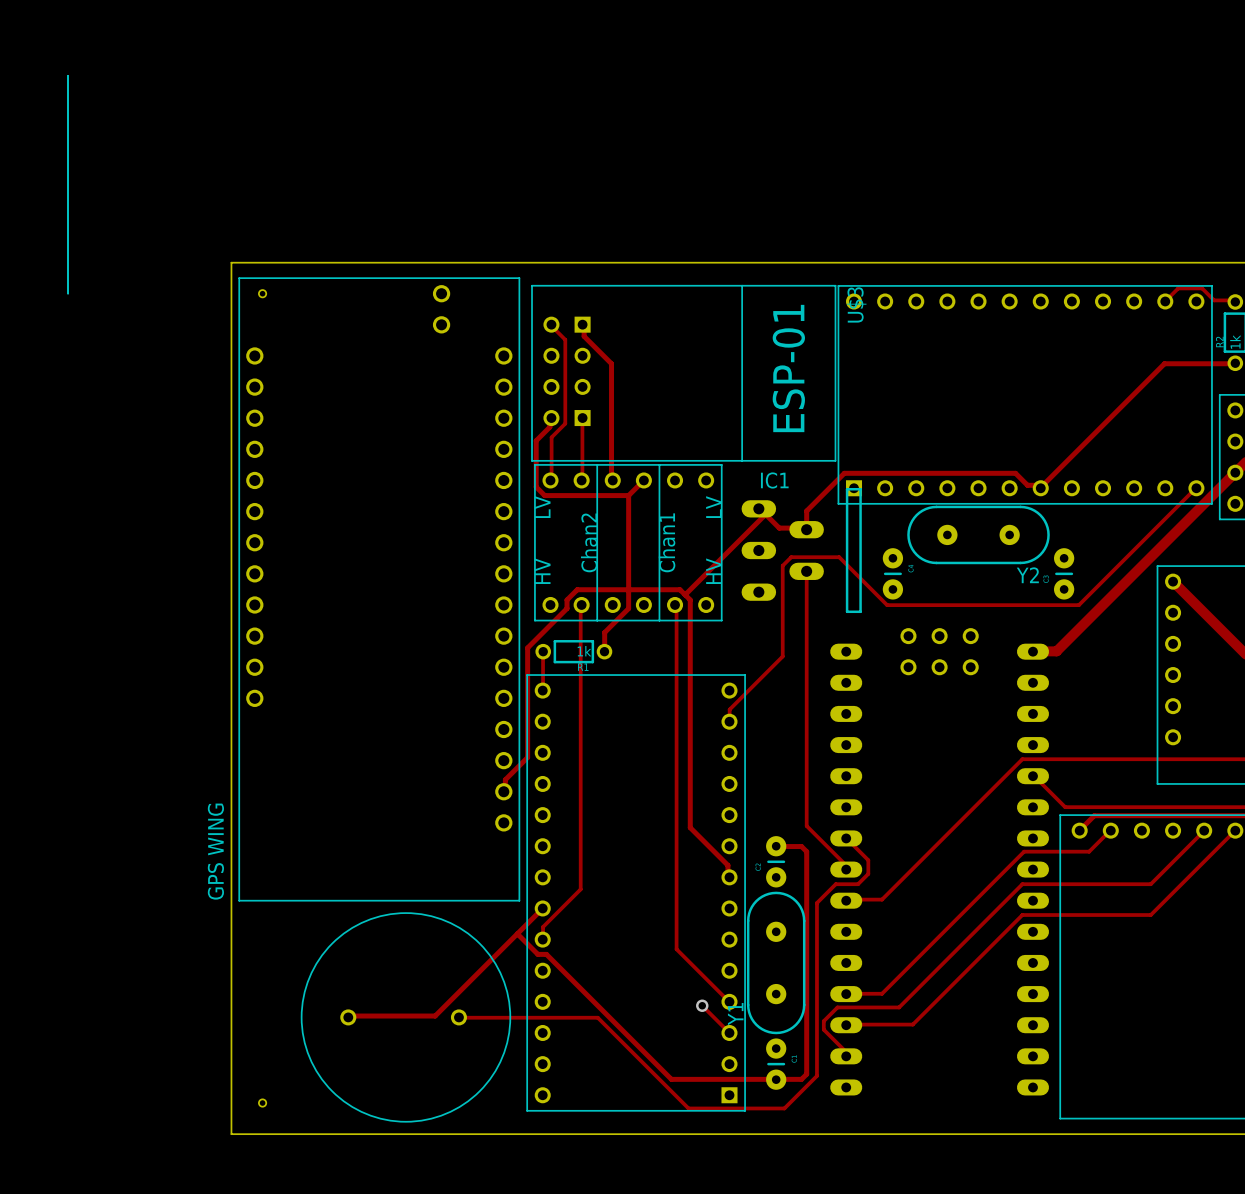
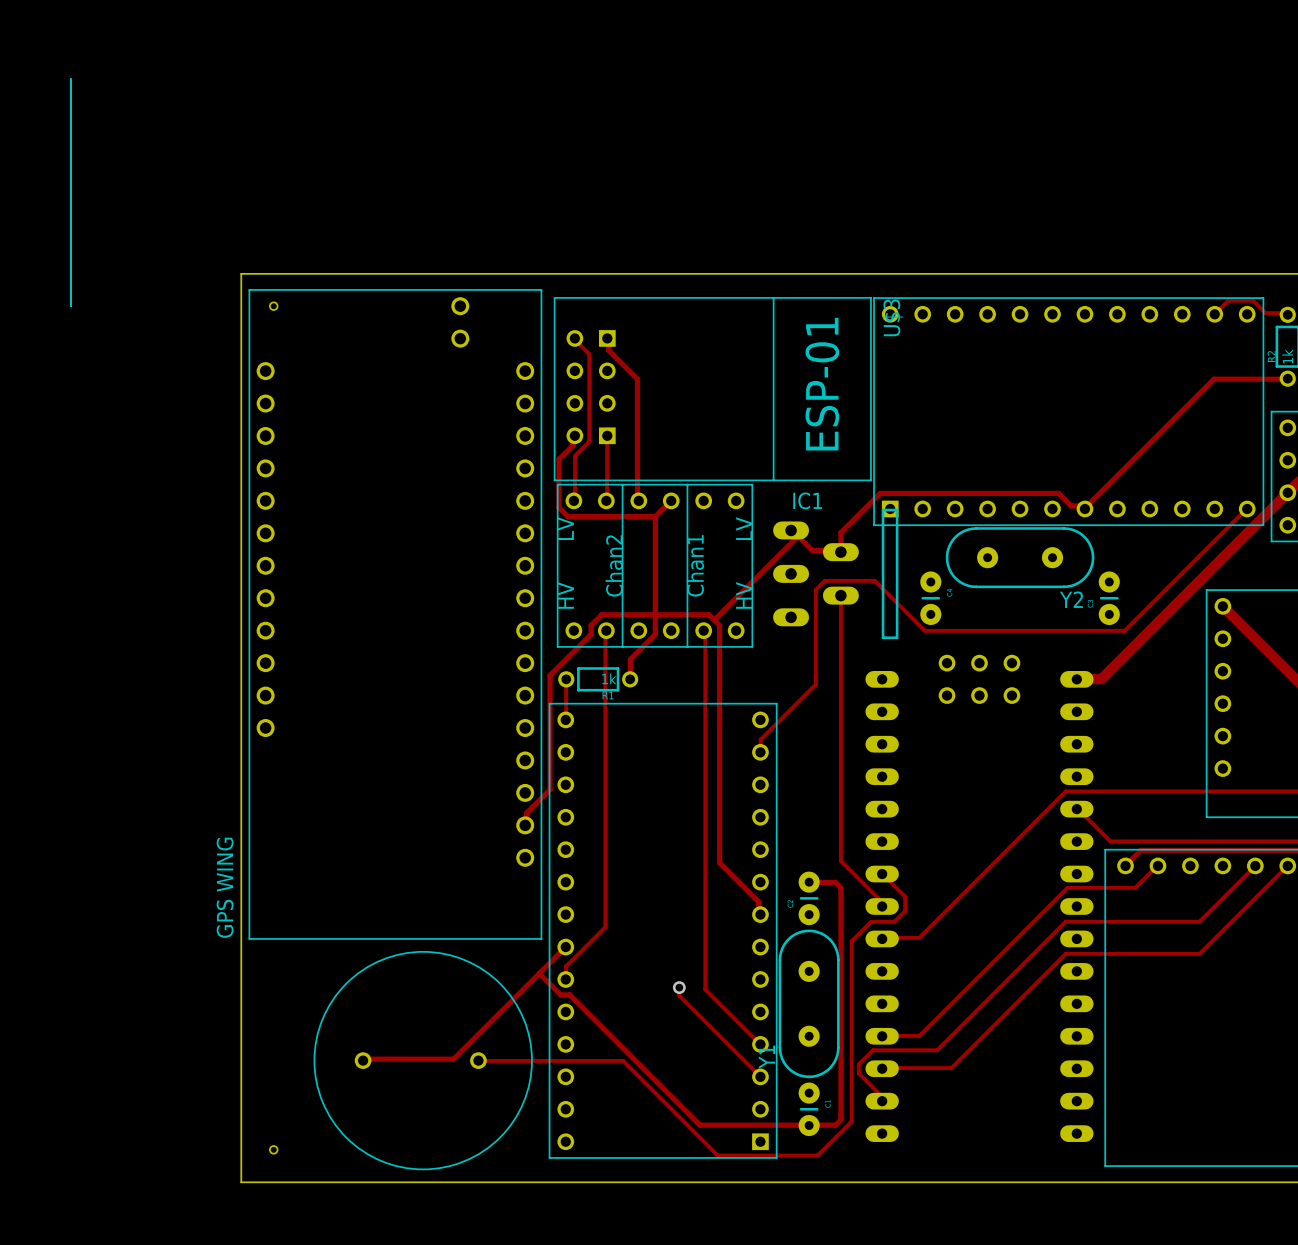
track: none -> (679, 987) (679, 995) (732, 1048)
via: none -> (679, 987)
via: (702, 1005) -> none

